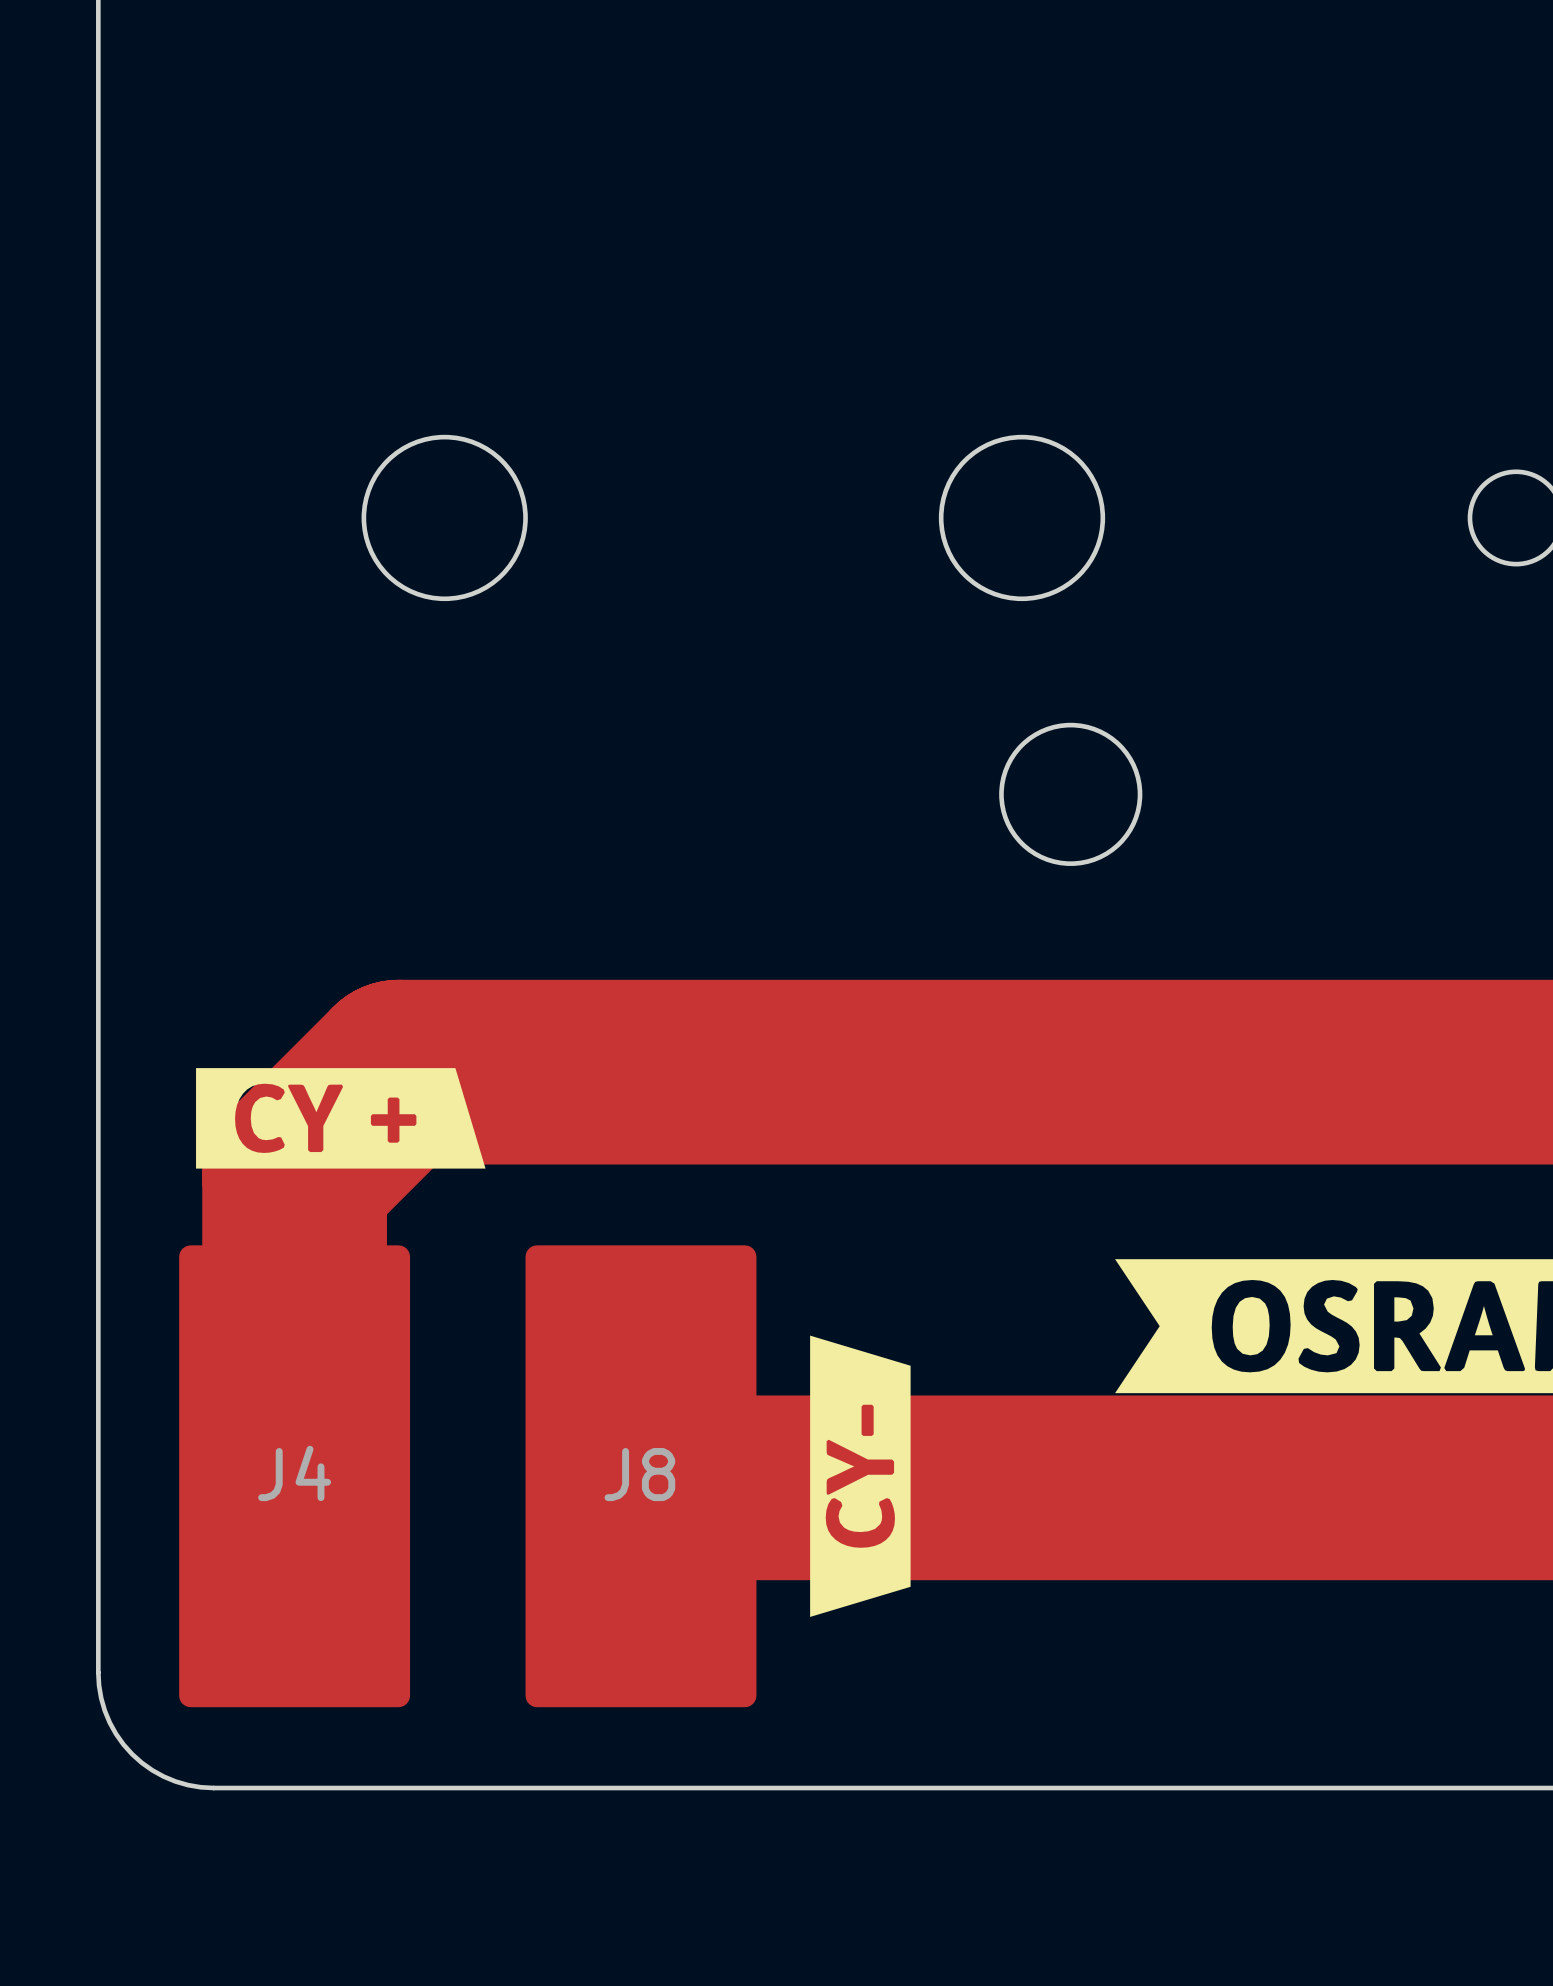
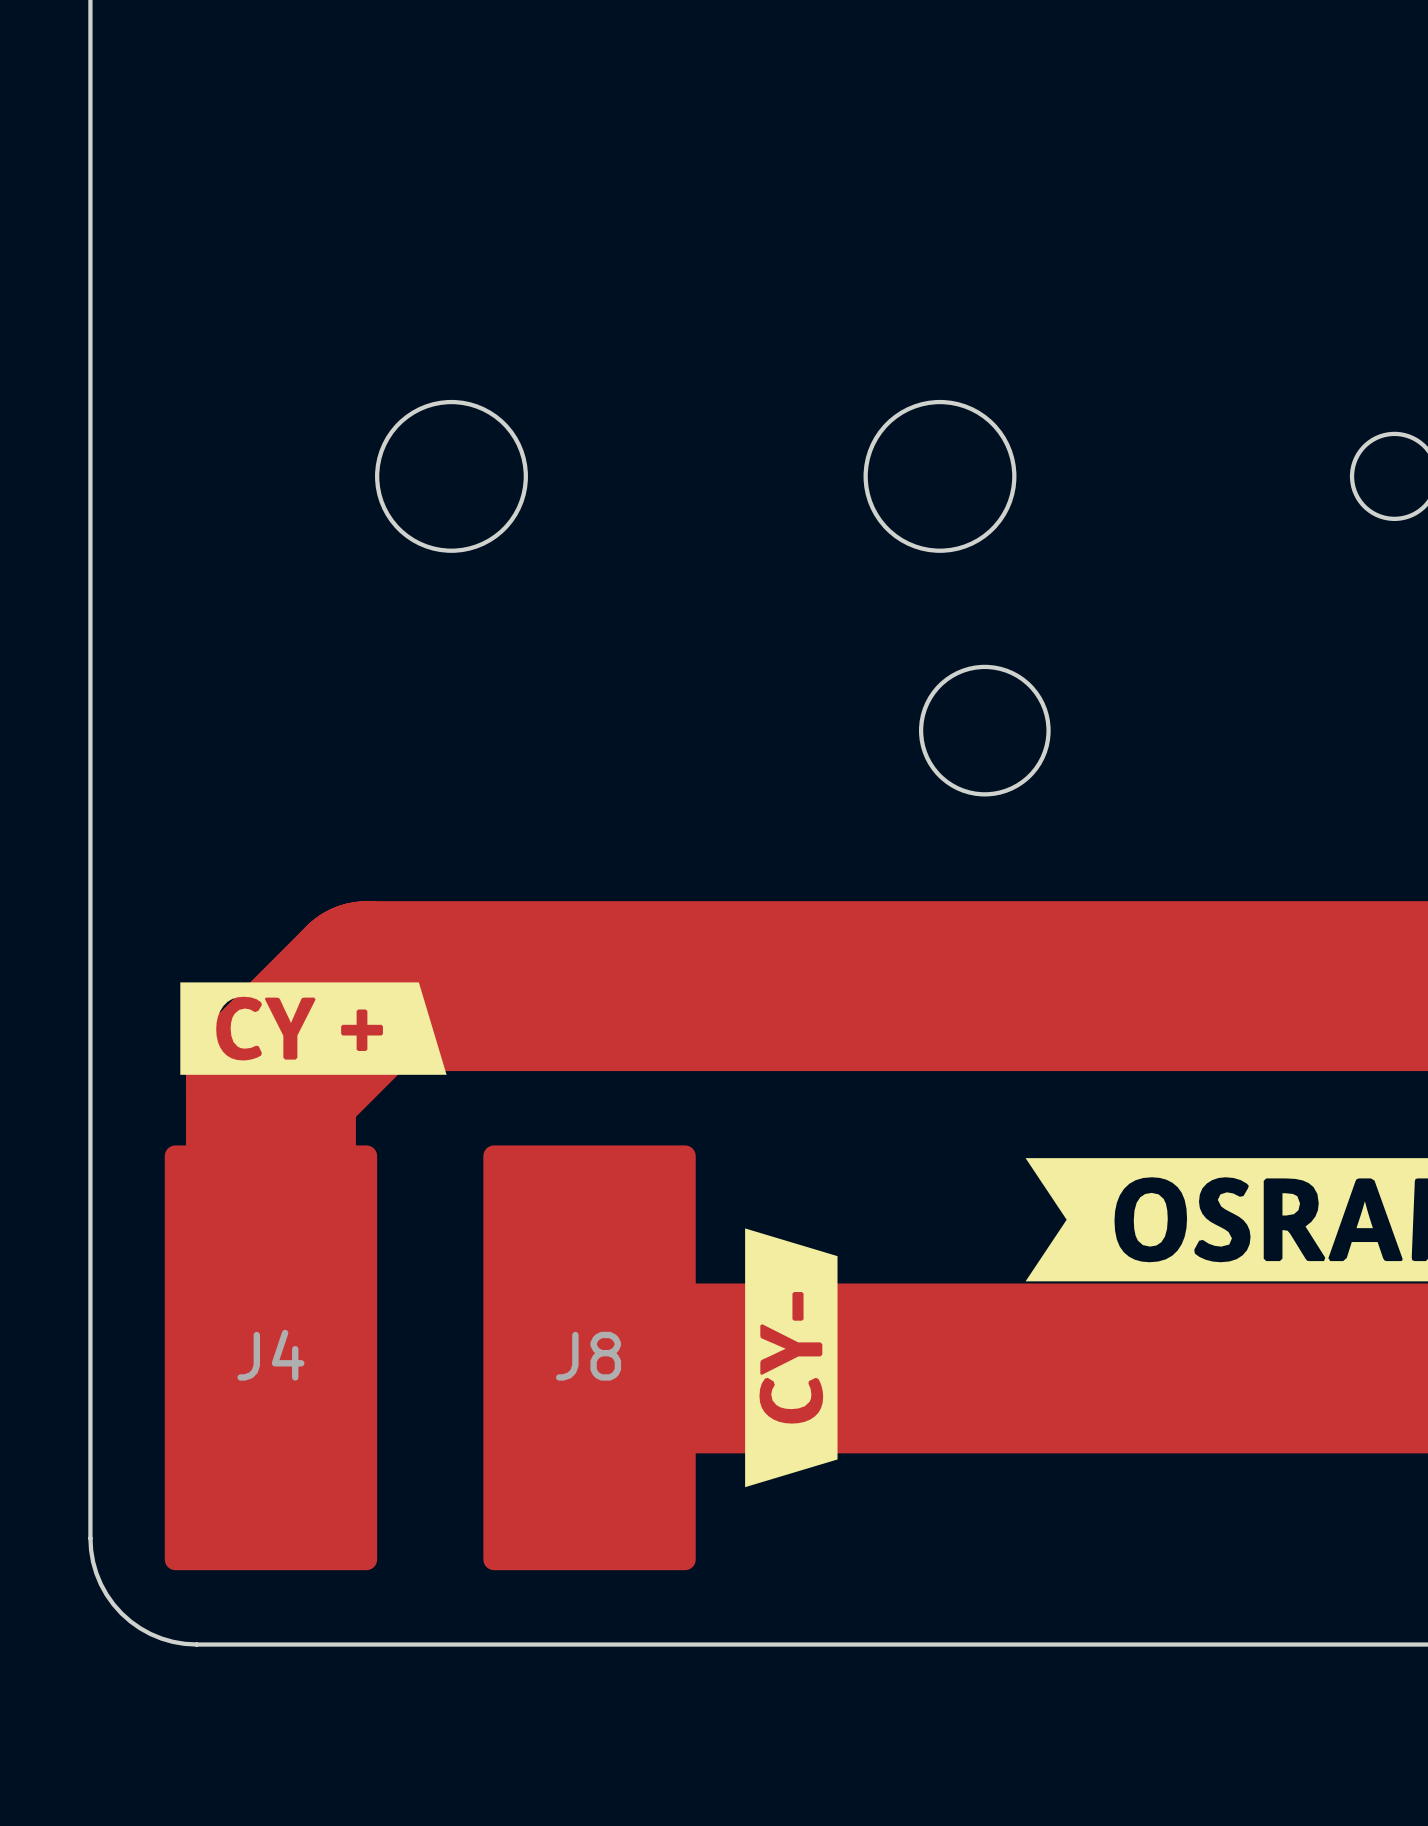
round board edge position: (444, 517) -> (451, 476)

